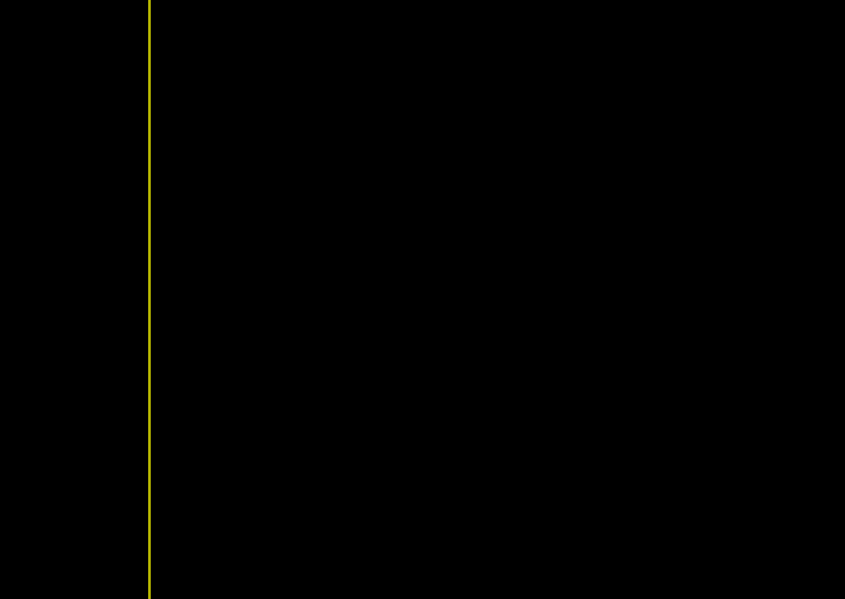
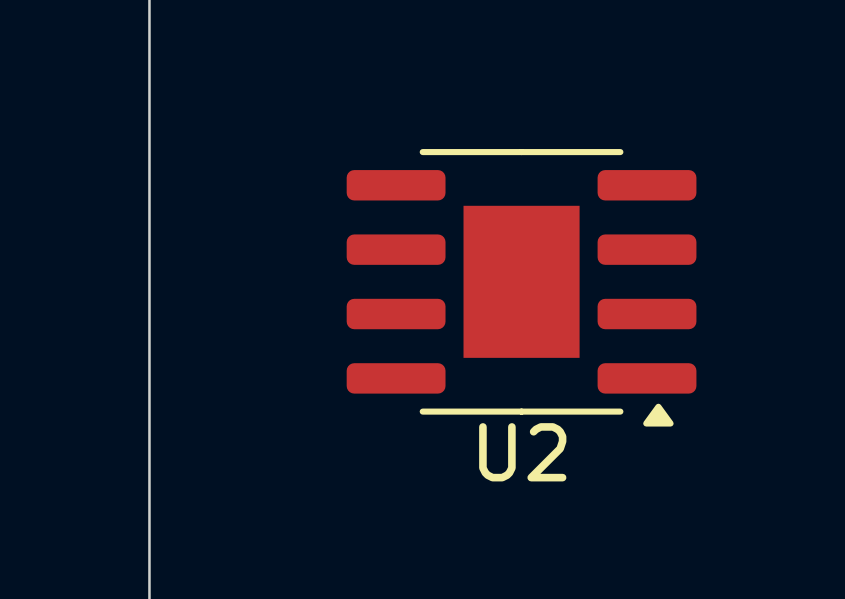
U2: none -> (521, 287)

